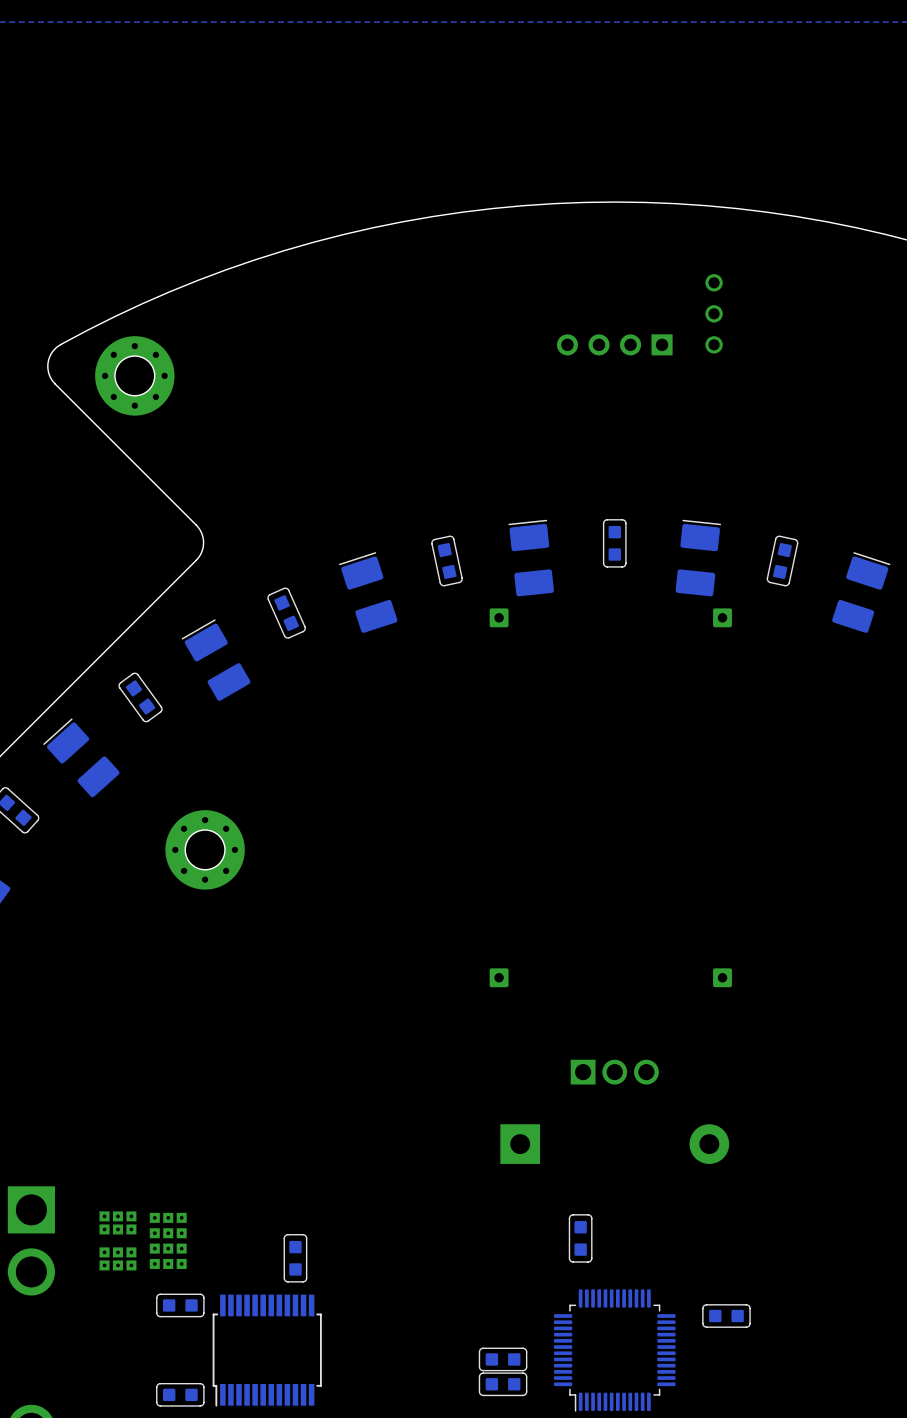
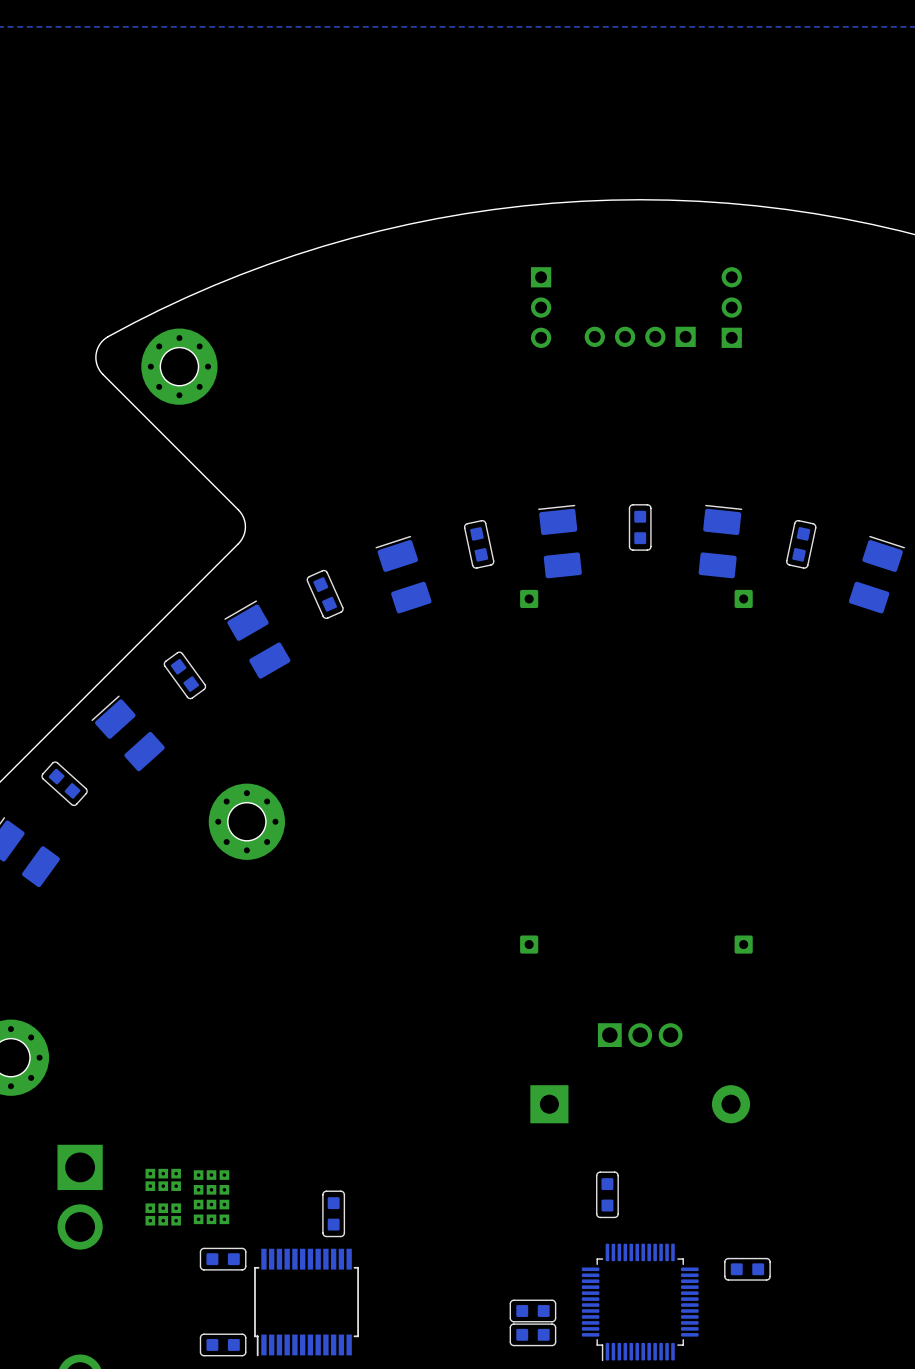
part footprint: [705, 274, 723, 354] -> [721, 267, 742, 348]
part: none -> (541, 307)

